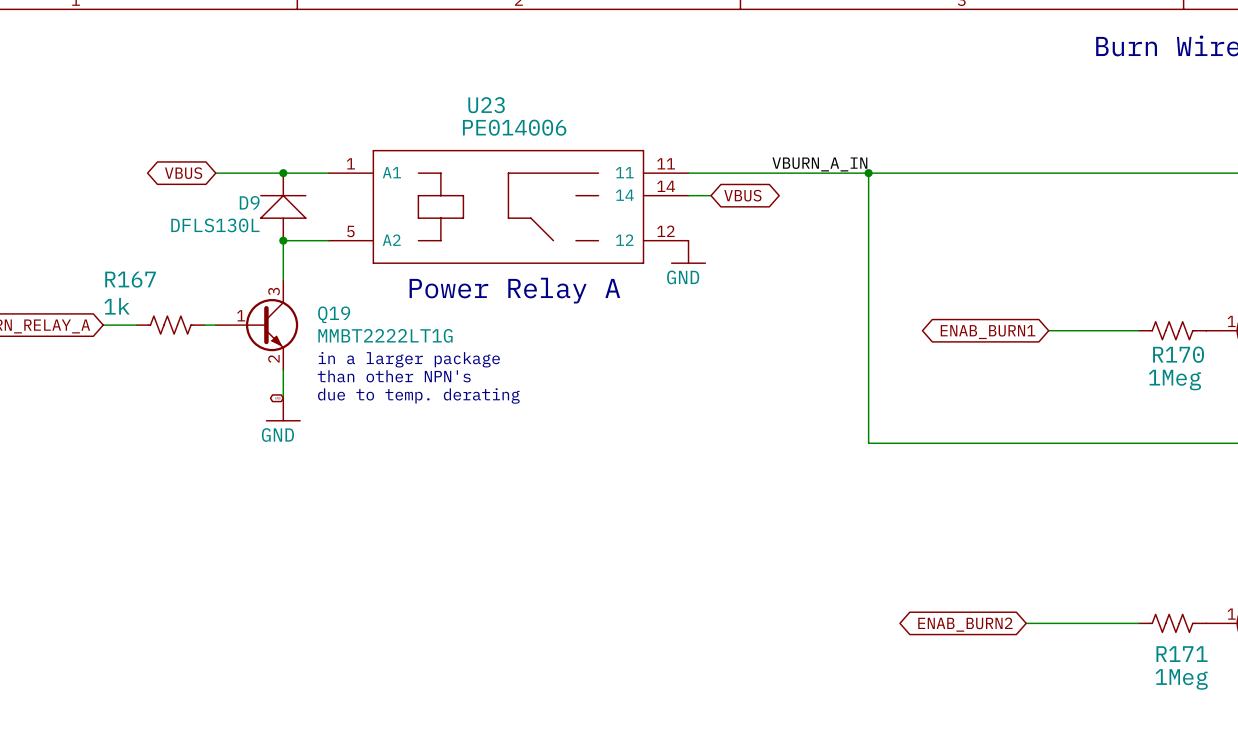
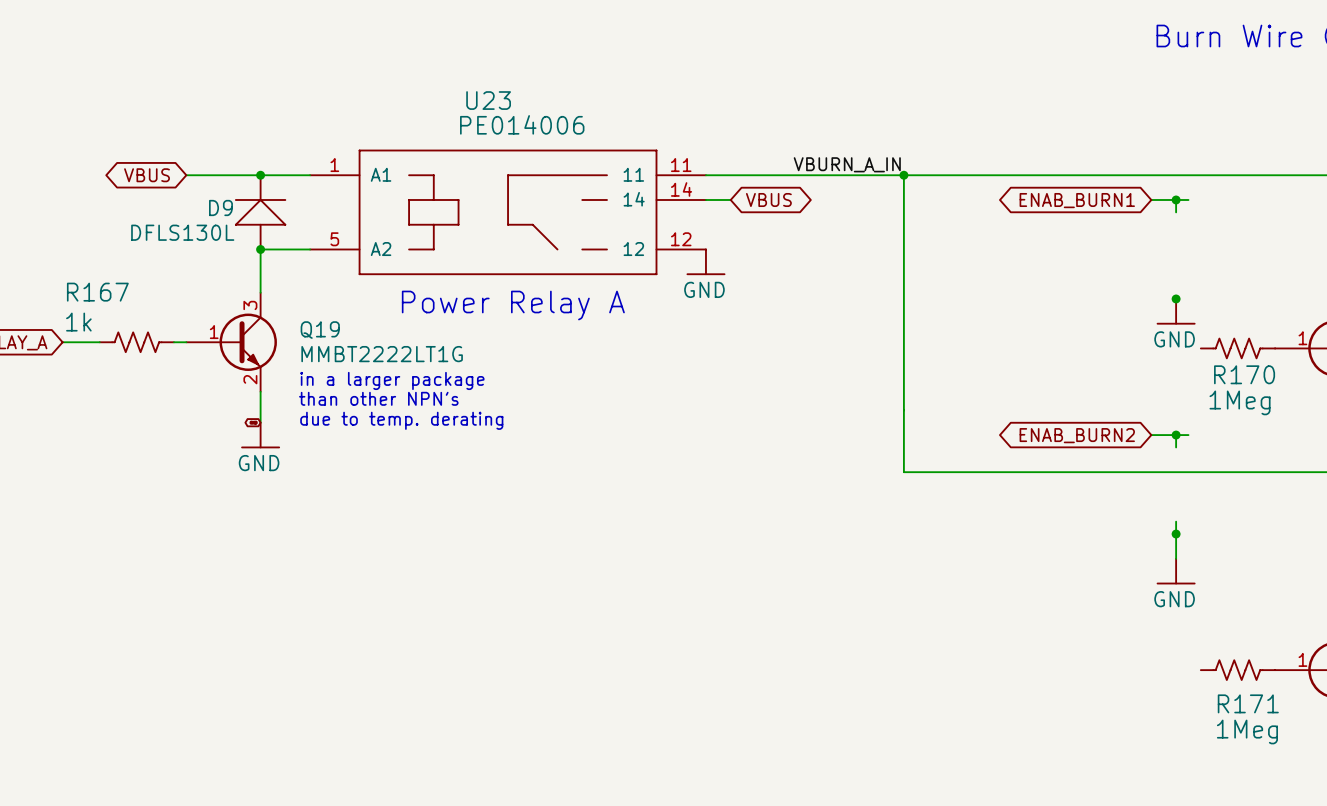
wire: none -> (1151, 199) (1188, 199)
wire: none -> (1176, 199) (1176, 212)
junction: none -> (1176, 199)
junction: none -> (1176, 298)
power symbol: none -> GND (1176, 311)
wire: (1048, 330) (1138, 330) -> none
global label position: ENAB_BURN1 (988, 332) -> ENAB_BURN1 (1077, 200)
wire: none -> (1151, 435) (1188, 435)
wire: none -> (1176, 435) (1176, 447)
junction: none -> (1176, 435)
global label: none -> ENAB_BURN2 (1077, 435)
wire: none -> (1176, 521) (1176, 558)
junction: none -> (1176, 534)
power symbol: none -> GND (1176, 571)
wire: (1026, 623) (1138, 623) -> none
global label: ENAB_BURN2 (965, 624) -> none

